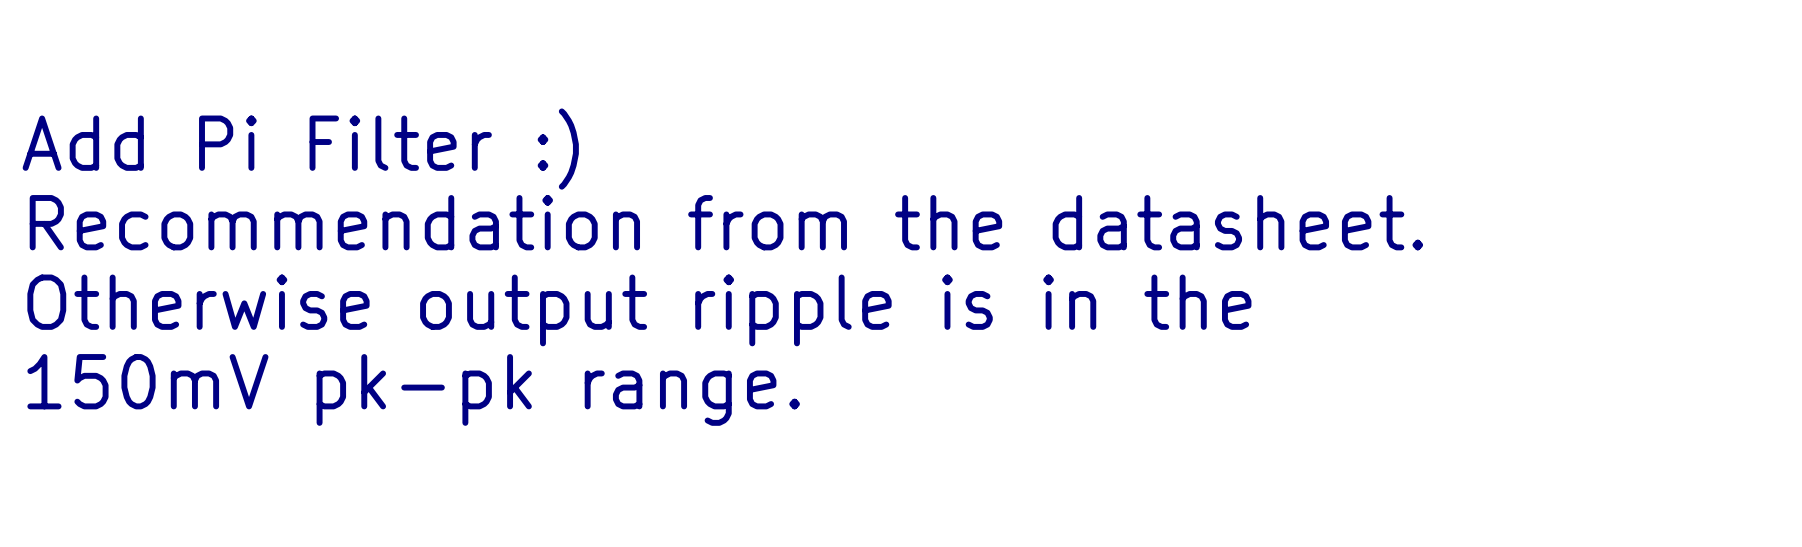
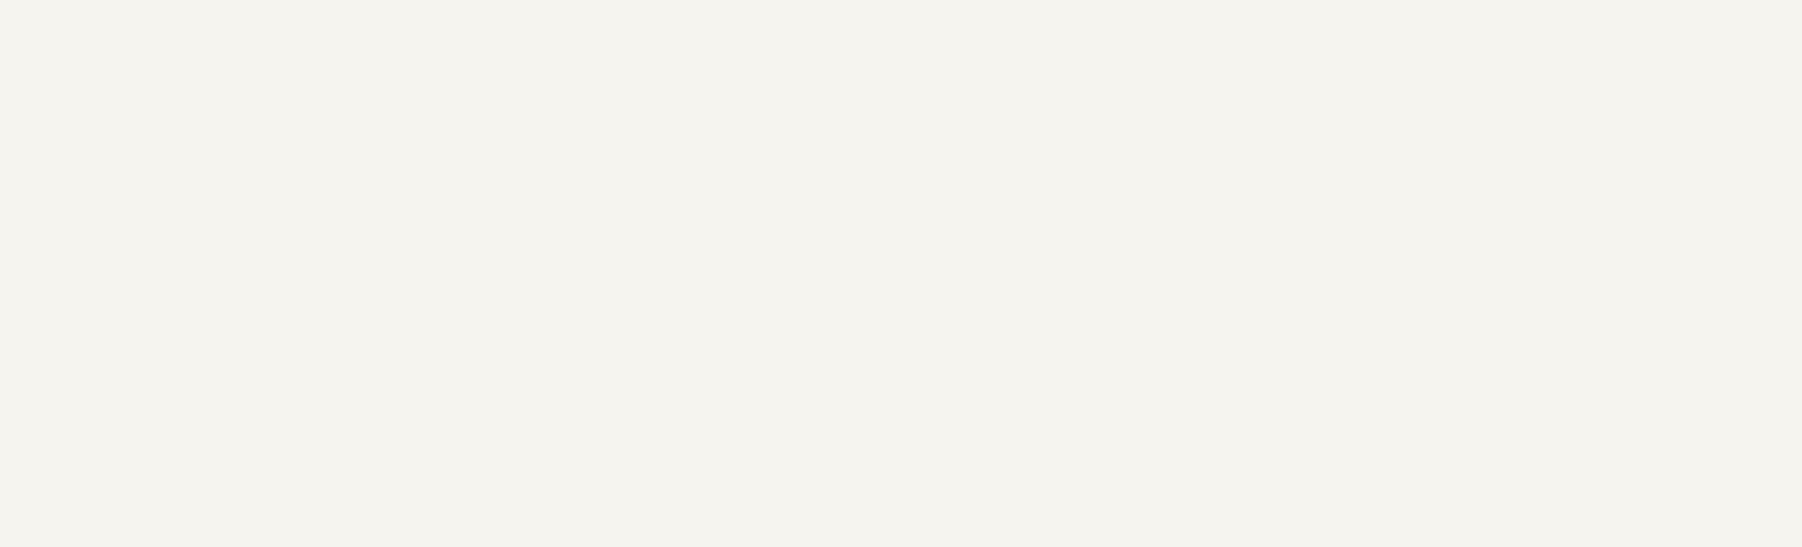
text: Add Pi Filter :) (300, 149) -> none
text: Recommendation from the datasheet. (726, 222) -> none
text: Otherwise output ripple is in the (639, 310) -> none
text: 150mV pk-pk range. (413, 389) -> none

